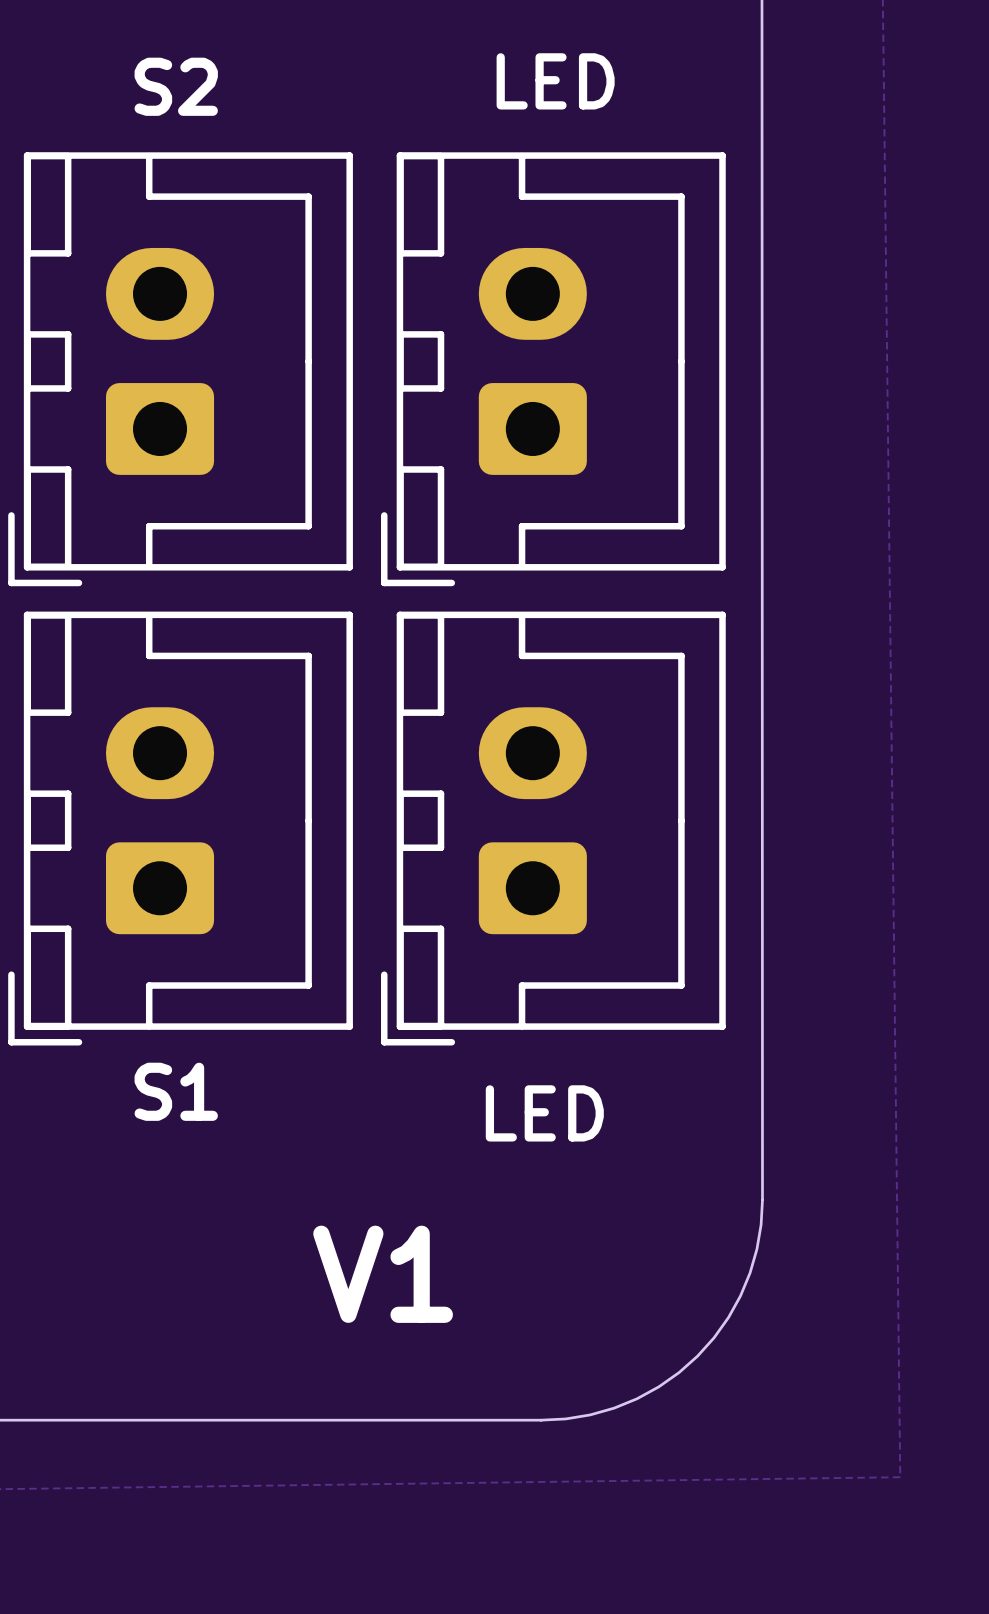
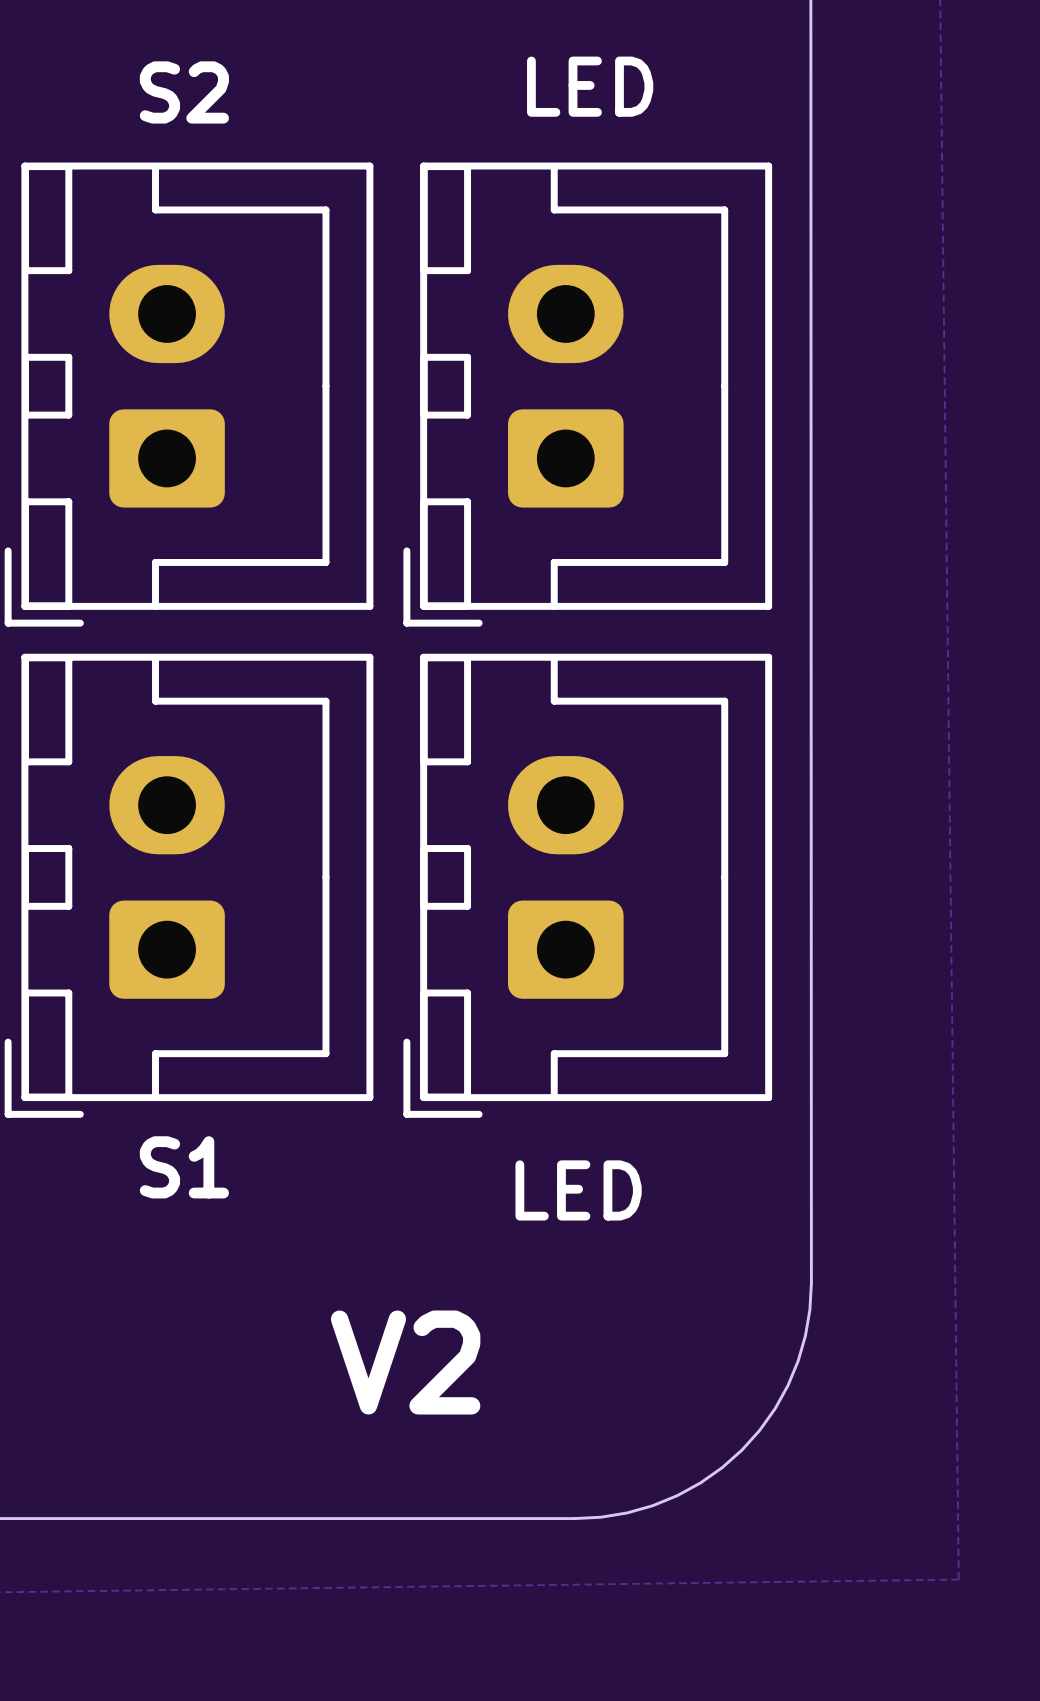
text: V1 (383, 1274) -> V2 (405, 1362)

